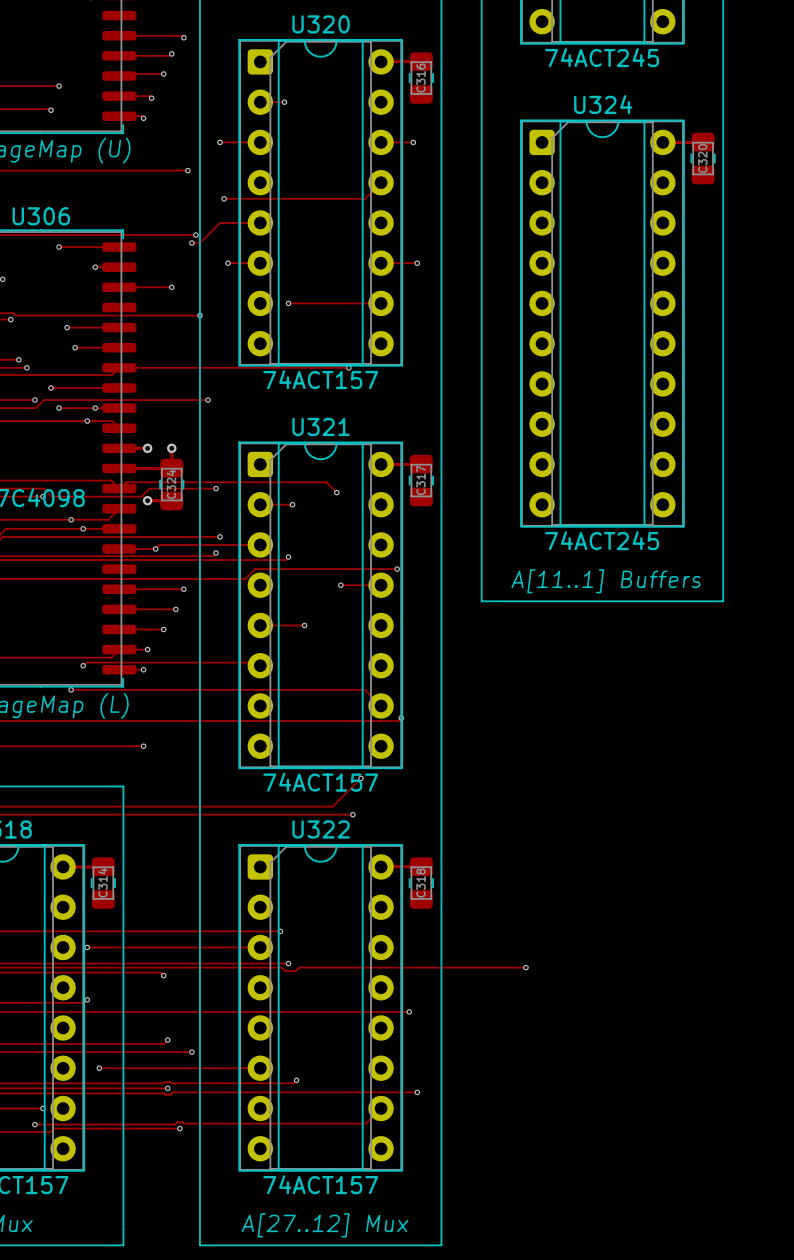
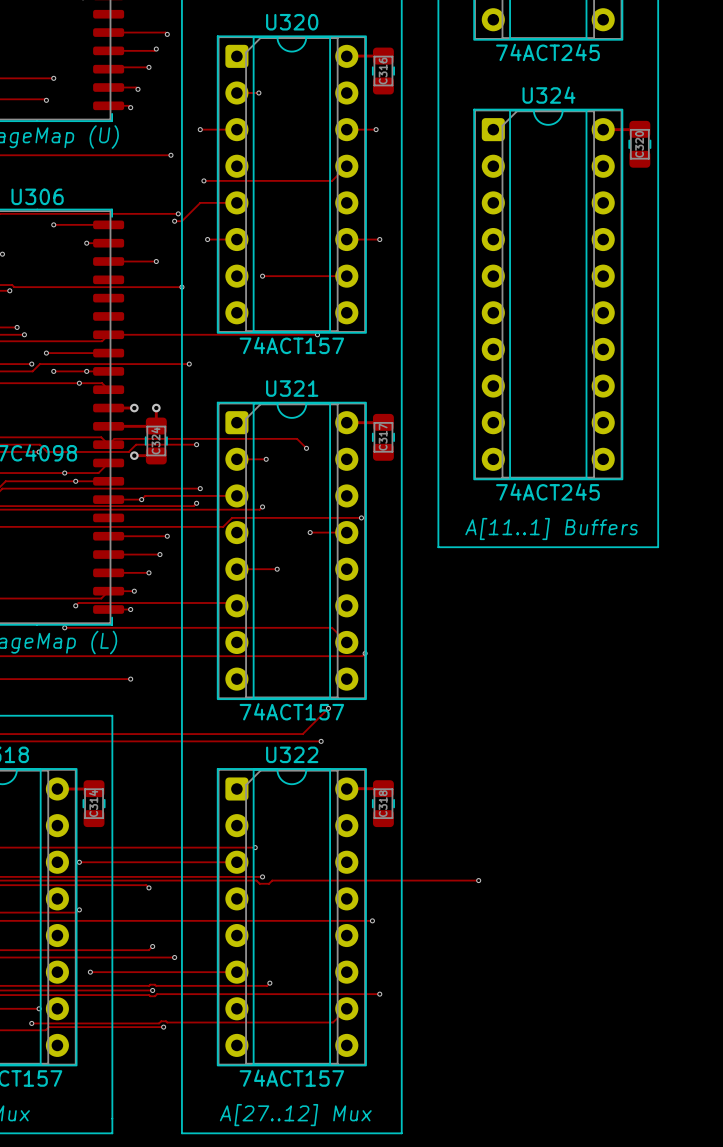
track: (67, 327) (119, 327) -> none
via: (67, 327) -> none
track: (75, 347) (119, 347) -> none
via: (75, 347) -> none

